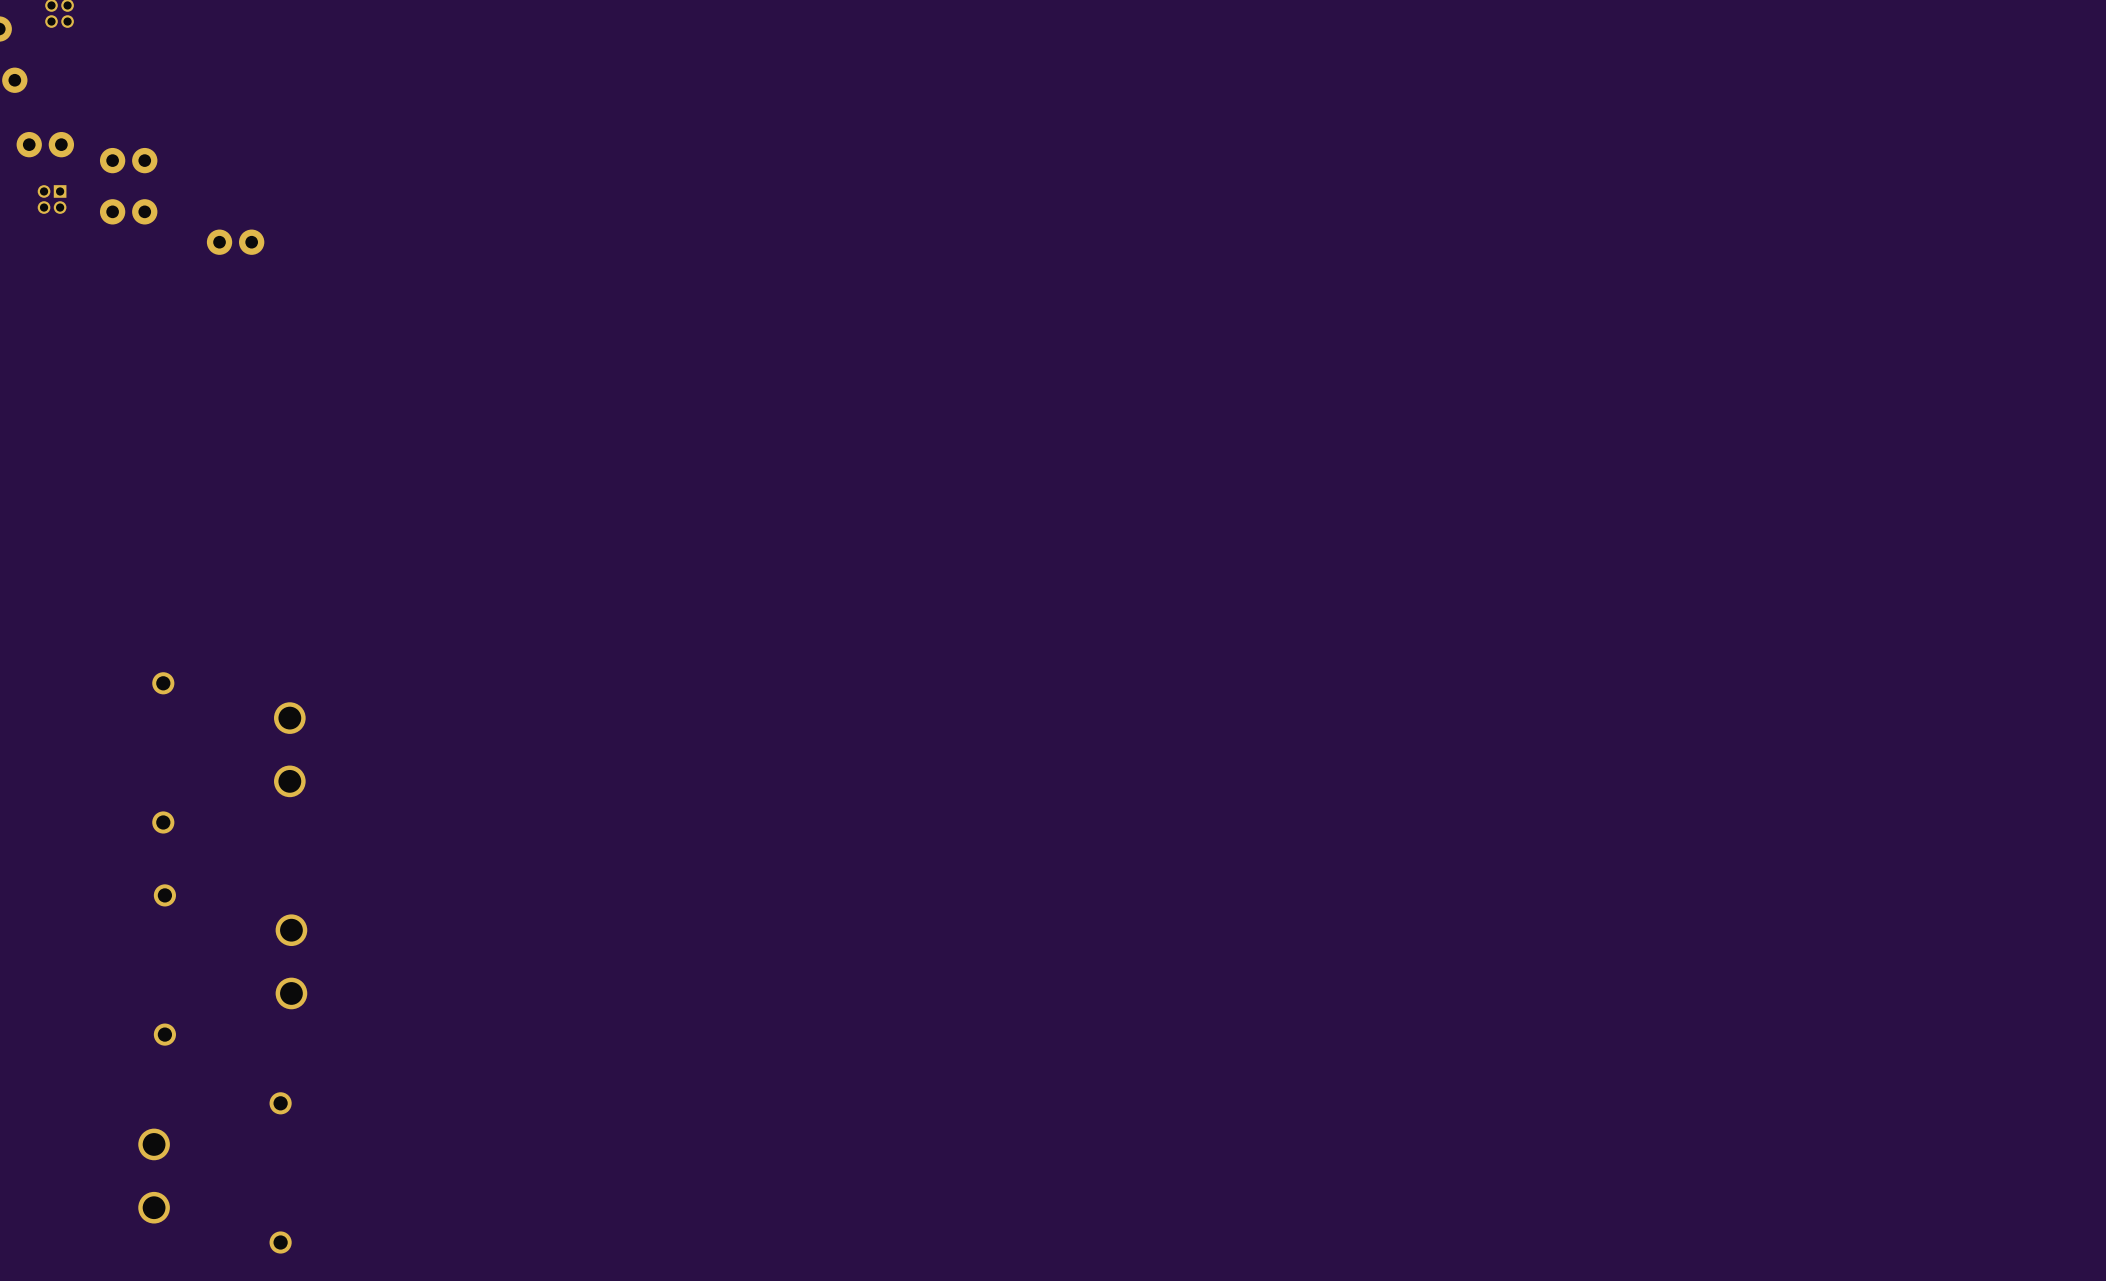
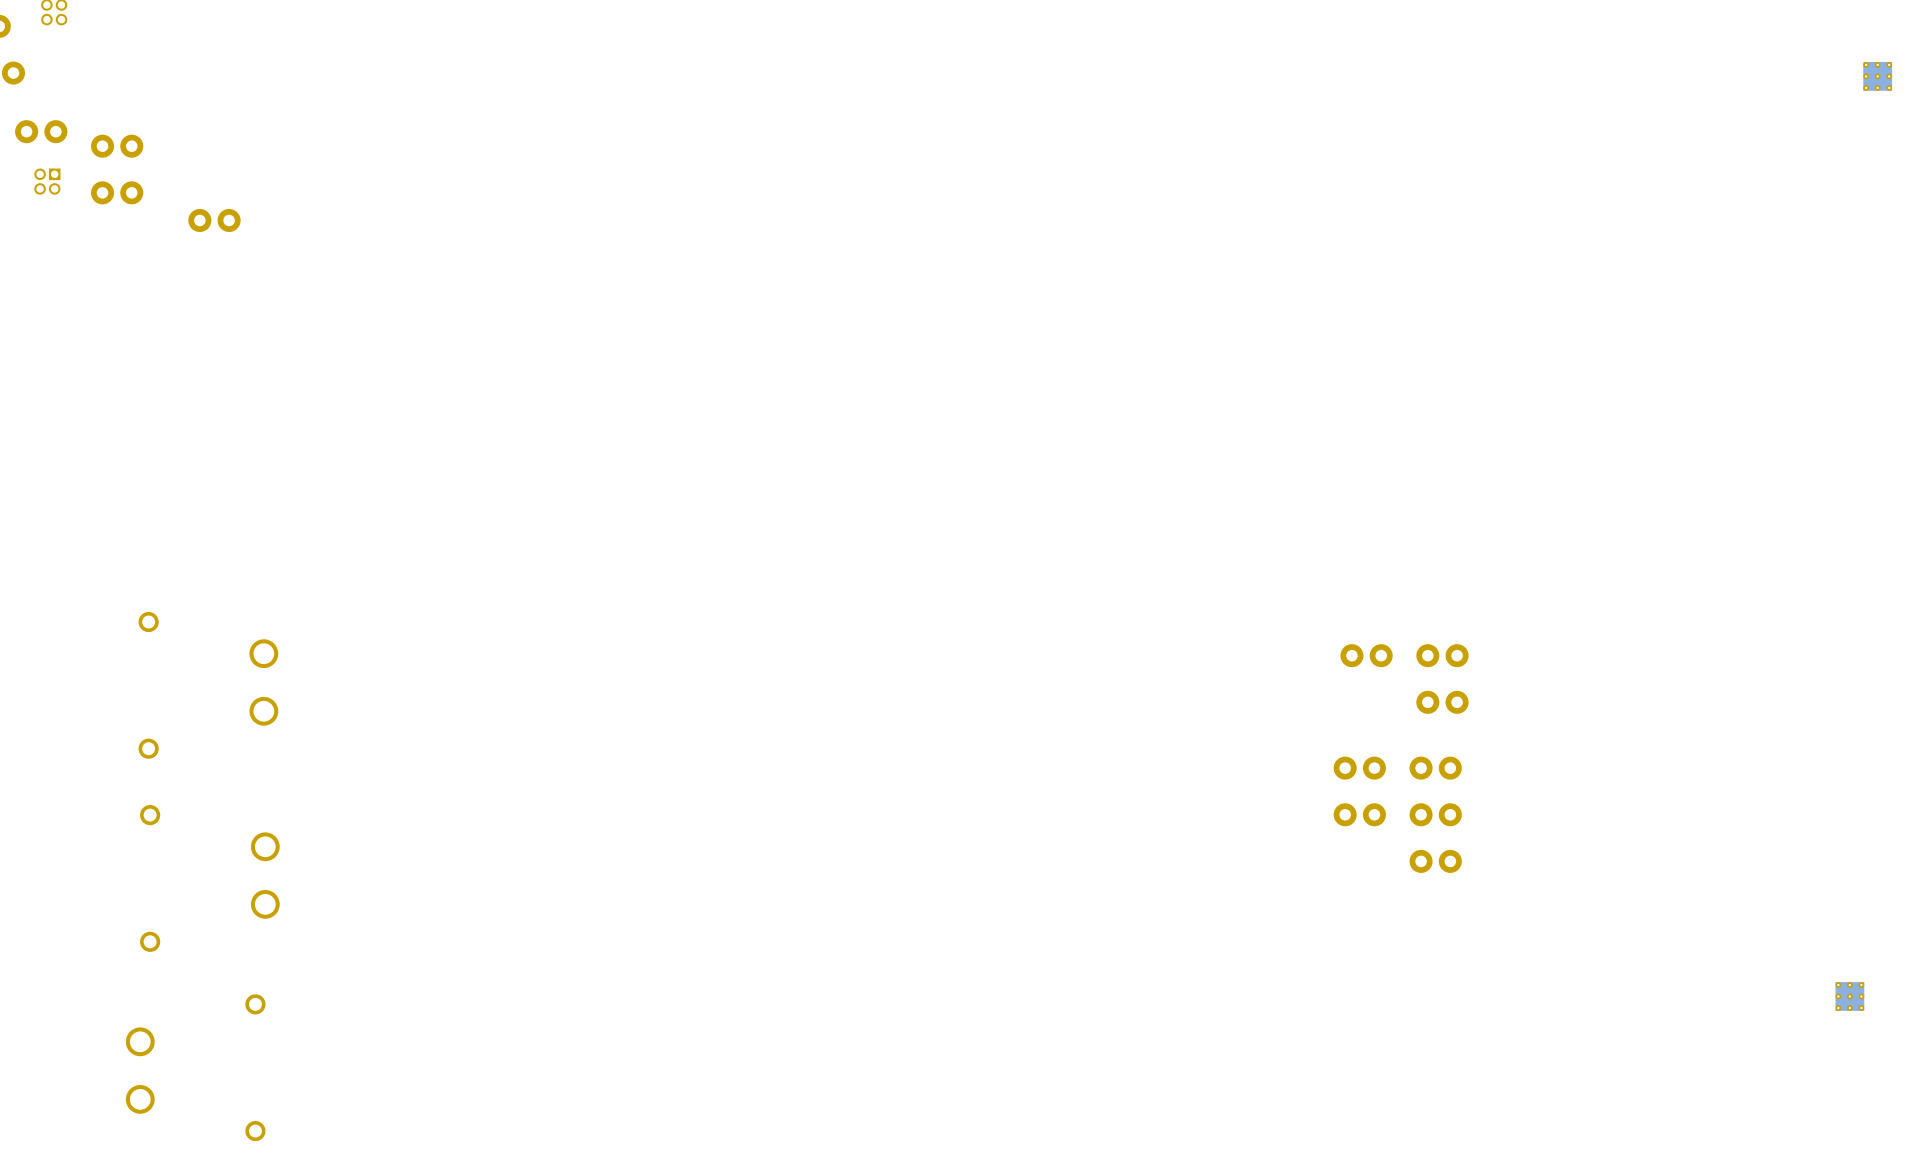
part: none -> (1877, 76)
part: none -> (1366, 655)
part: none -> (1442, 655)
part: none -> (1442, 702)
part: none -> (1359, 768)
part: none -> (1435, 768)
part: none -> (1359, 814)
part: none -> (1435, 814)
part: none -> (1435, 861)
part: none -> (1849, 996)

